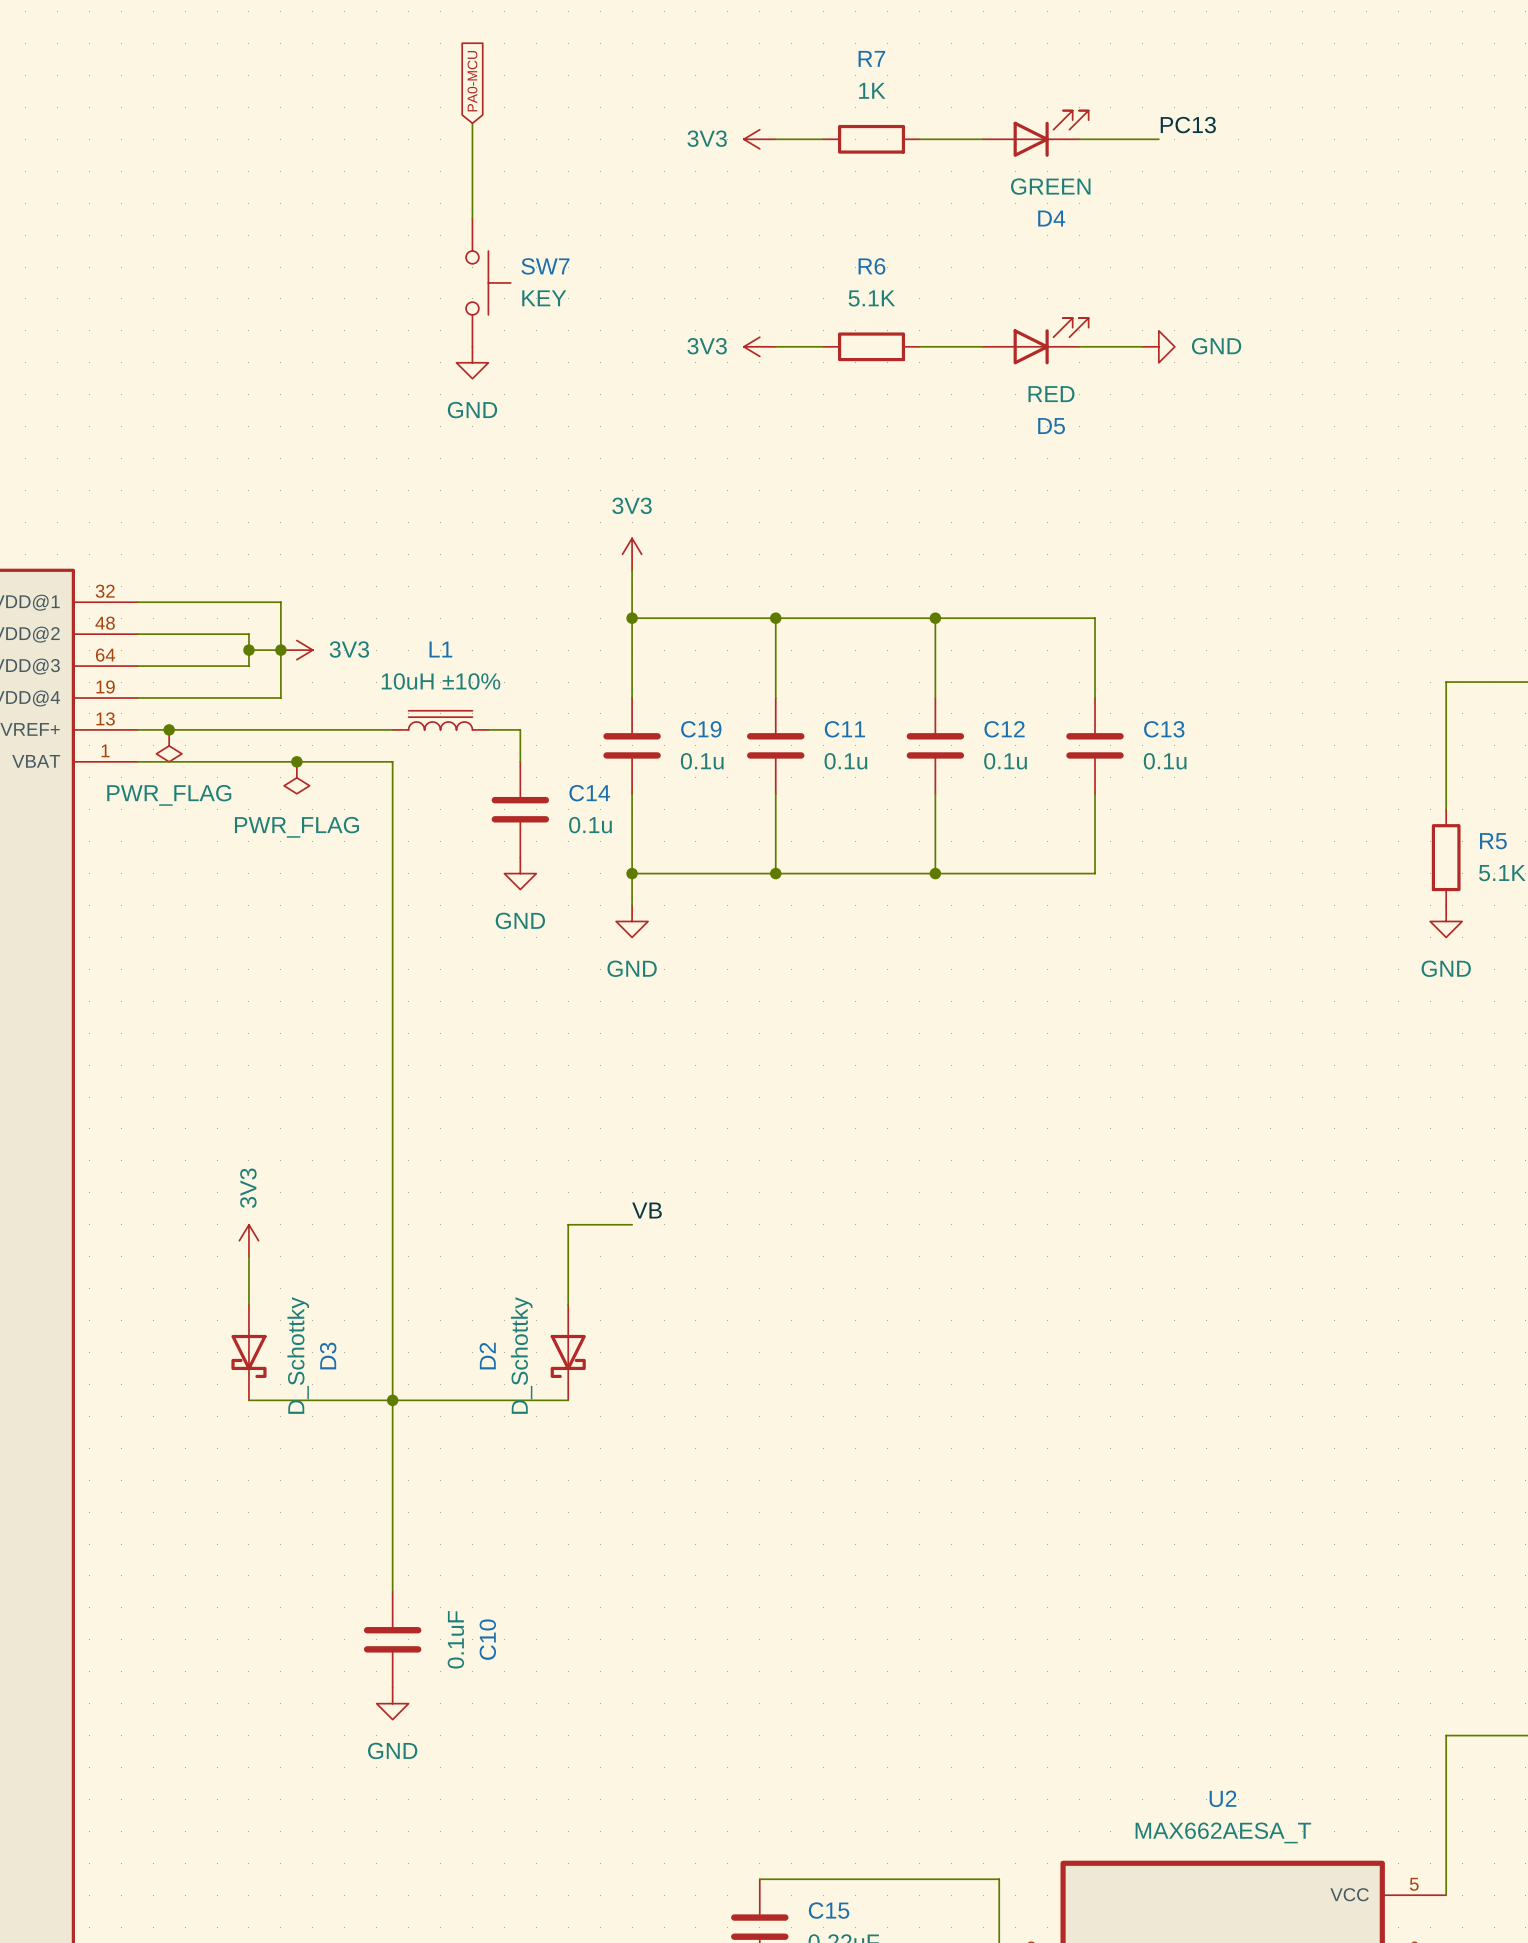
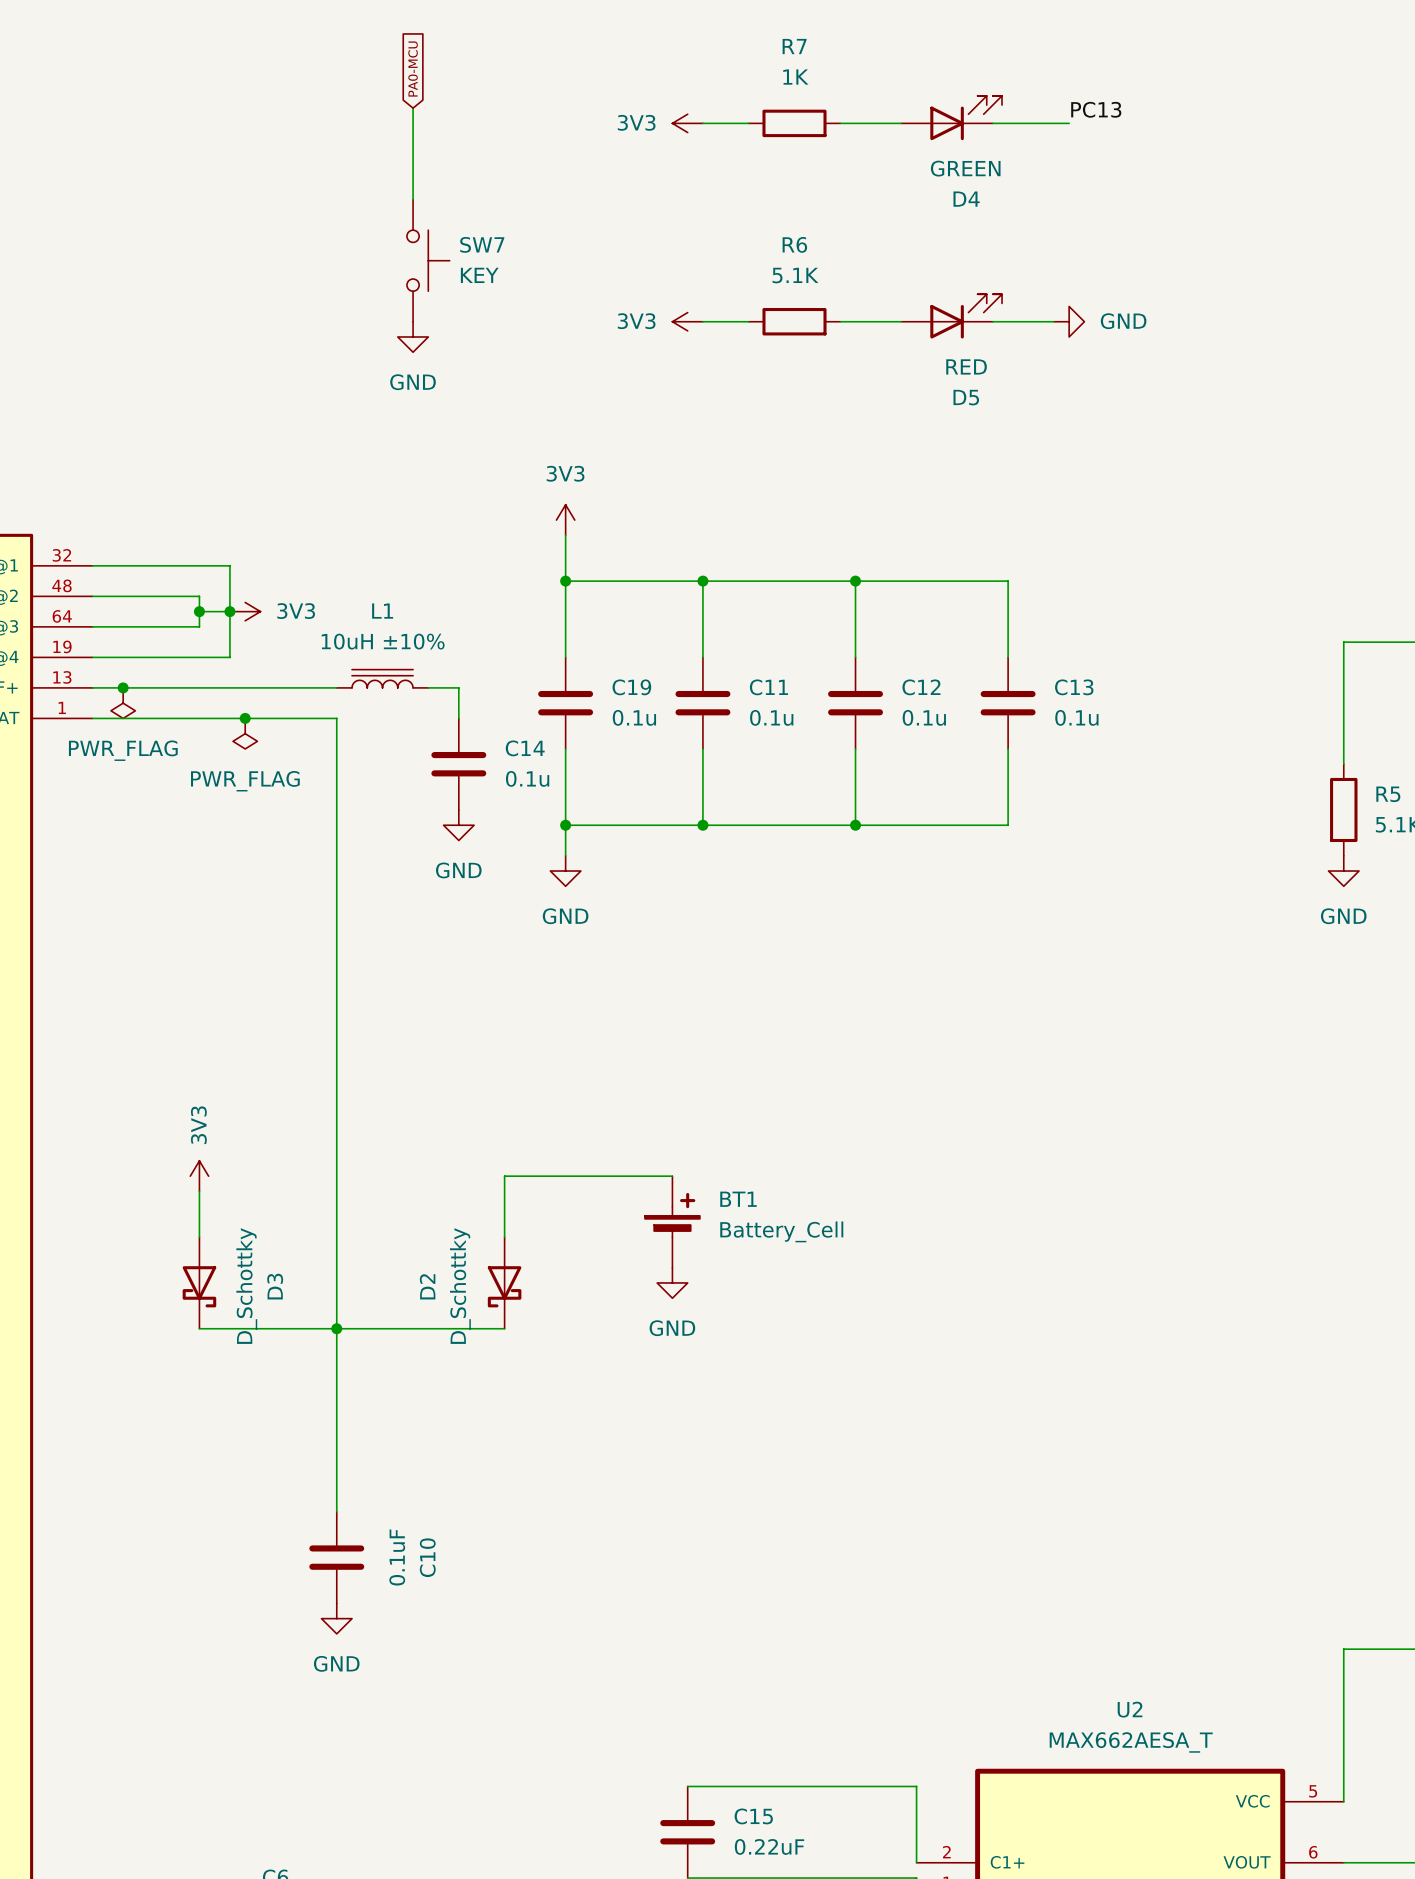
label: VB (646, 1210) -> none
wire: (632, 1224) (568, 1224) (568, 1240) -> (672, 1176) (504, 1176)
BT1: none -> Battery_Cell (672, 1221)
power symbol: none -> GND (672, 1282)

